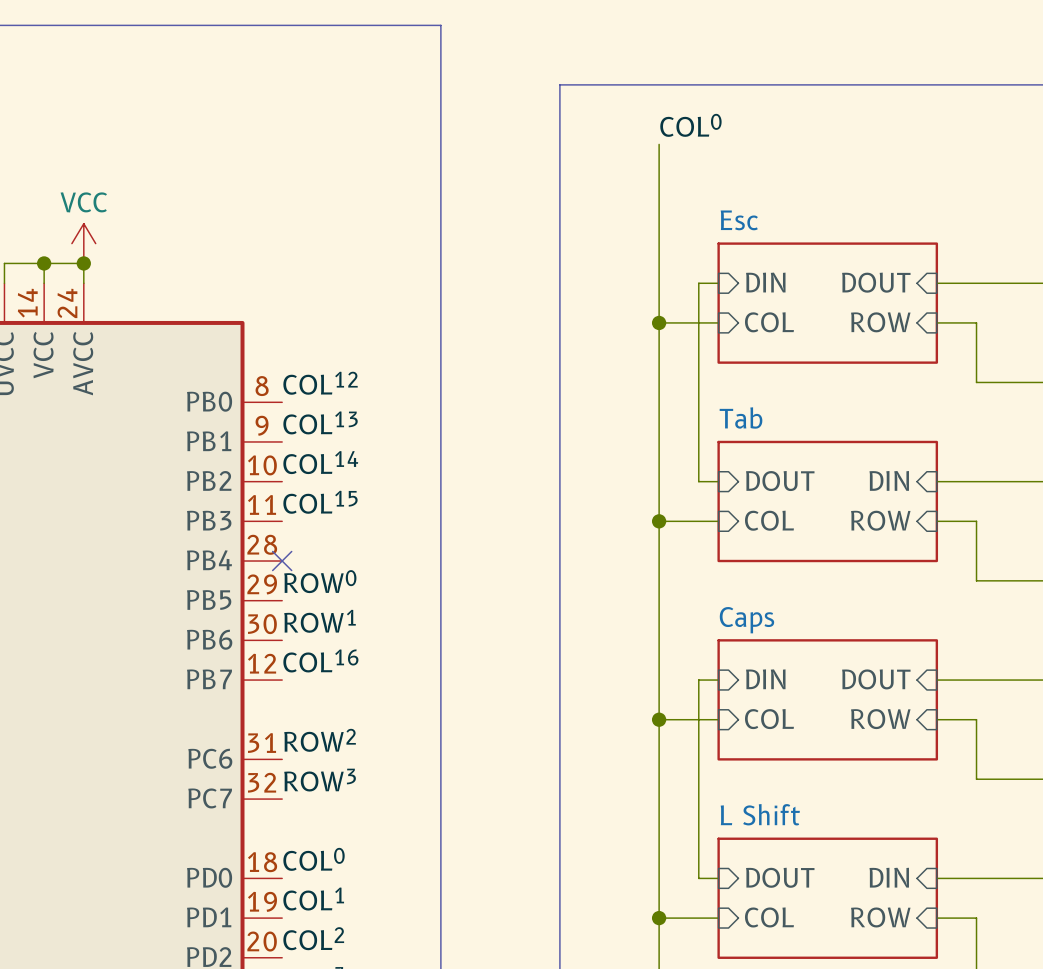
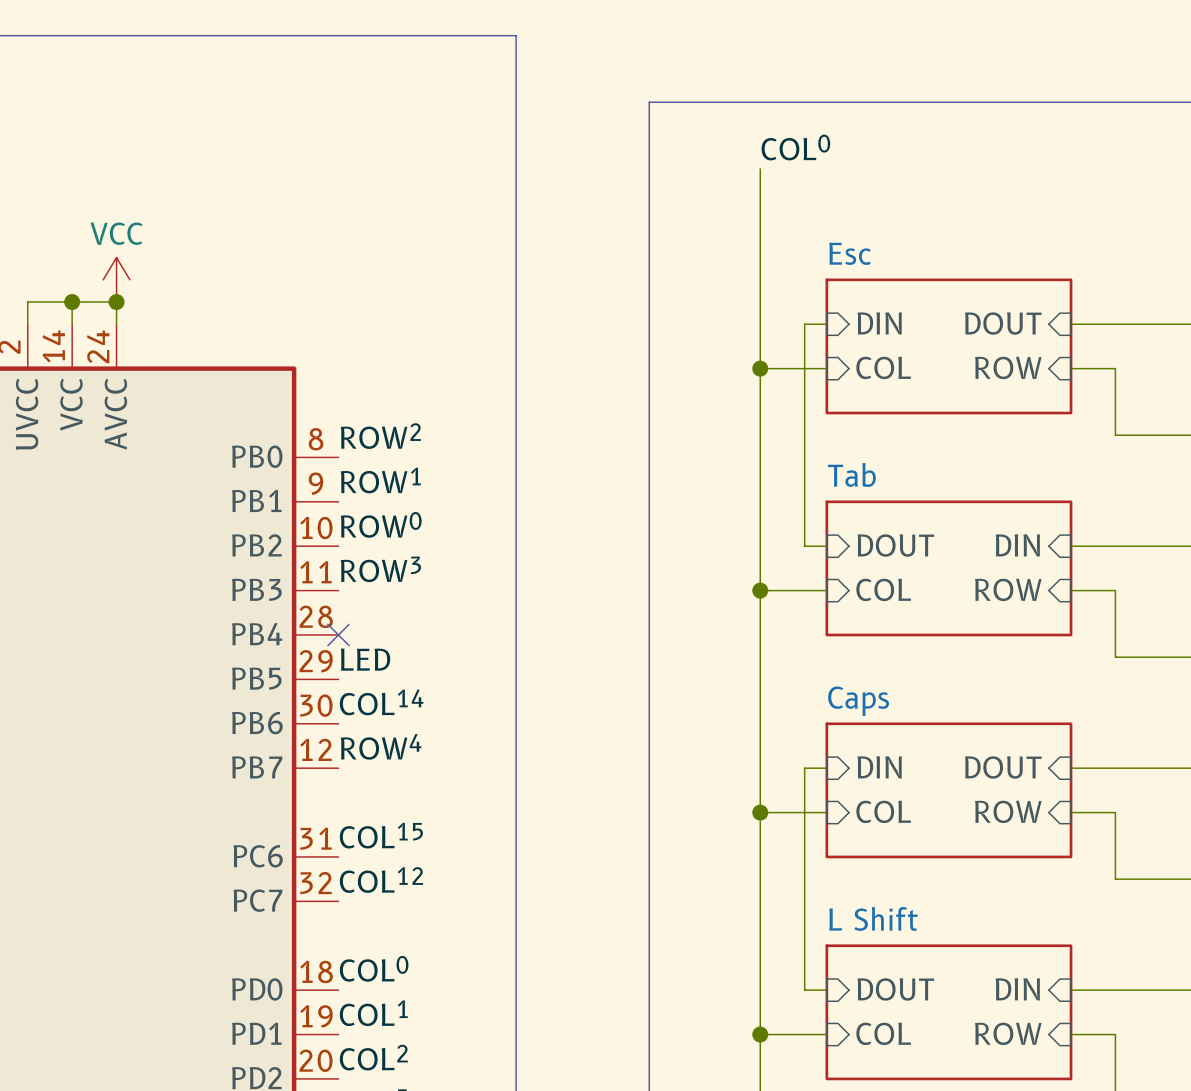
label: COL12 (320, 383) -> ROW2 (380, 436)
label: COL13 (320, 422) -> ROW1 (380, 480)
label: COL14 (320, 462) -> ROW0 (381, 524)
label: COL15 (320, 502) -> ROW3 (380, 569)
label: ROW0 (320, 581) -> LED (365, 659)
label: ROW1 (320, 621) -> COL14 (381, 702)
label: COL16 (320, 660) -> ROW4 (381, 746)
label: ROW2 (320, 740) -> COL15 (381, 835)
label: ROW3 (320, 780) -> COL12 (381, 880)

